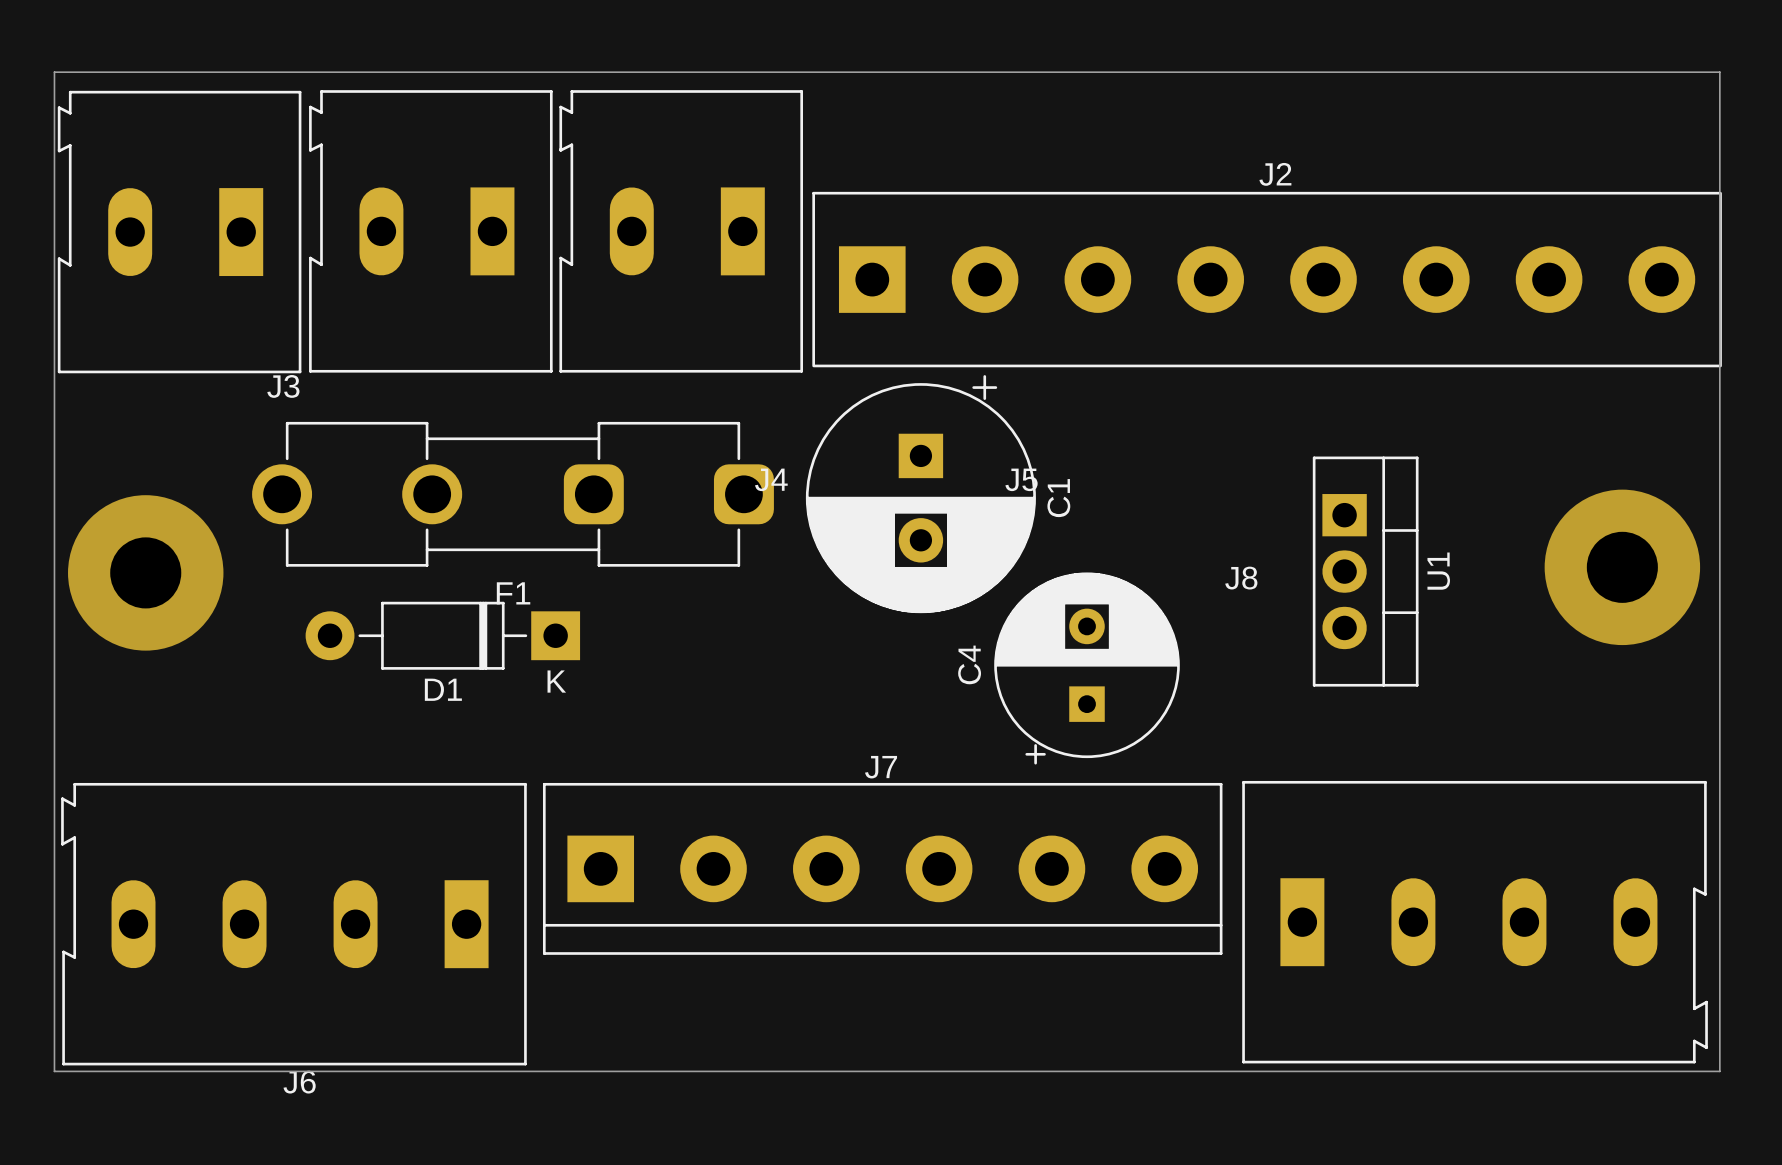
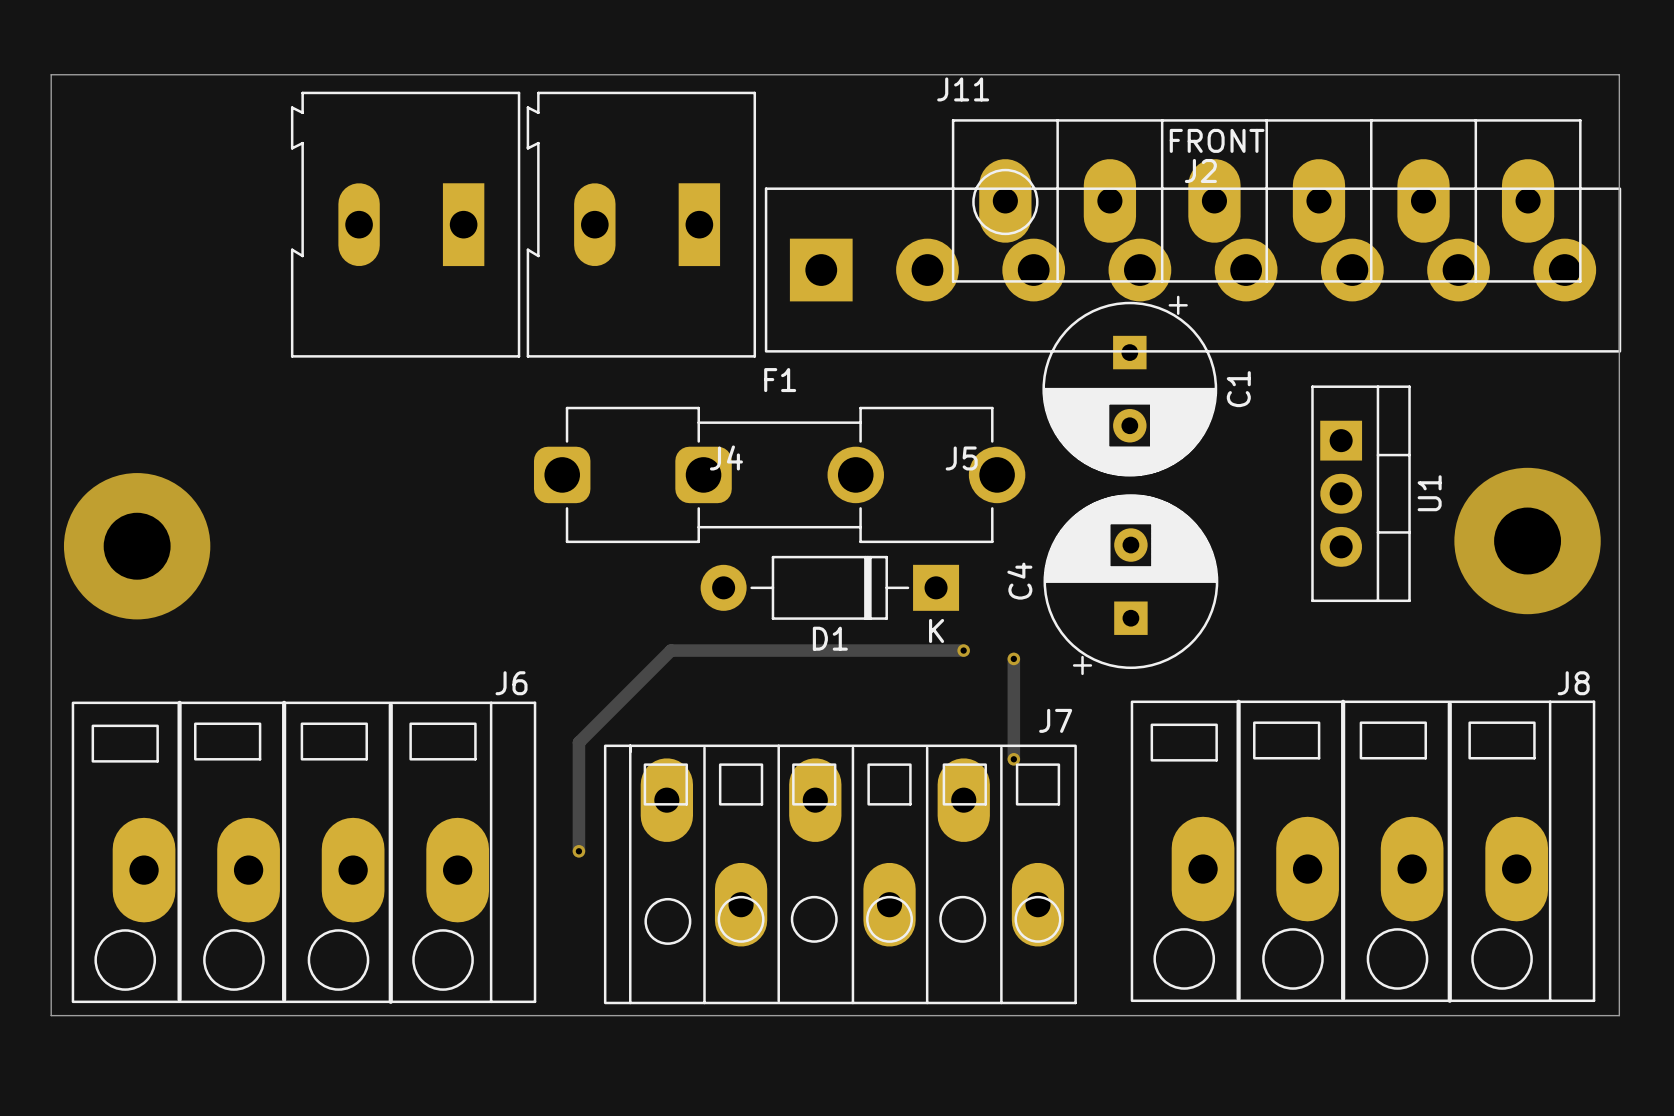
J11: none -> (1266, 200)
J3: (179, 232) -> none
C1 footprint: [805, 375, 1036, 614] -> [1042, 295, 1218, 477]
F1 rotation: 0° (513, 494) -> 180° (779, 474)
F1 position: (513, 494) -> (779, 474)
U1 position: (1365, 571) -> (1361, 493)
J8 name position: J8 (1241, 578) -> J8 (1573, 683)
D1 position: (442, 635) -> (829, 587)
C4 position: (1087, 668) -> (1130, 584)
track: none -> (963, 650) (670, 650) (578, 742) (578, 851)
via: none -> (963, 650)
track: none -> (1013, 658) (1013, 759)
via: none -> (1013, 658)
J7 name position: J7 (881, 767) -> J7 (1055, 720)
J8 footprint: [1242, 780, 1708, 1064] -> [1130, 699, 1596, 1003]
J6 footprint: [61, 782, 527, 1066] -> [71, 700, 537, 1004]
J7 footprint: [542, 782, 1223, 955] -> [603, 744, 1077, 1005]
via: none -> (1013, 759)
via: none -> (578, 851)
J6 name position: J6 (299, 1082) -> J6 (511, 683)

